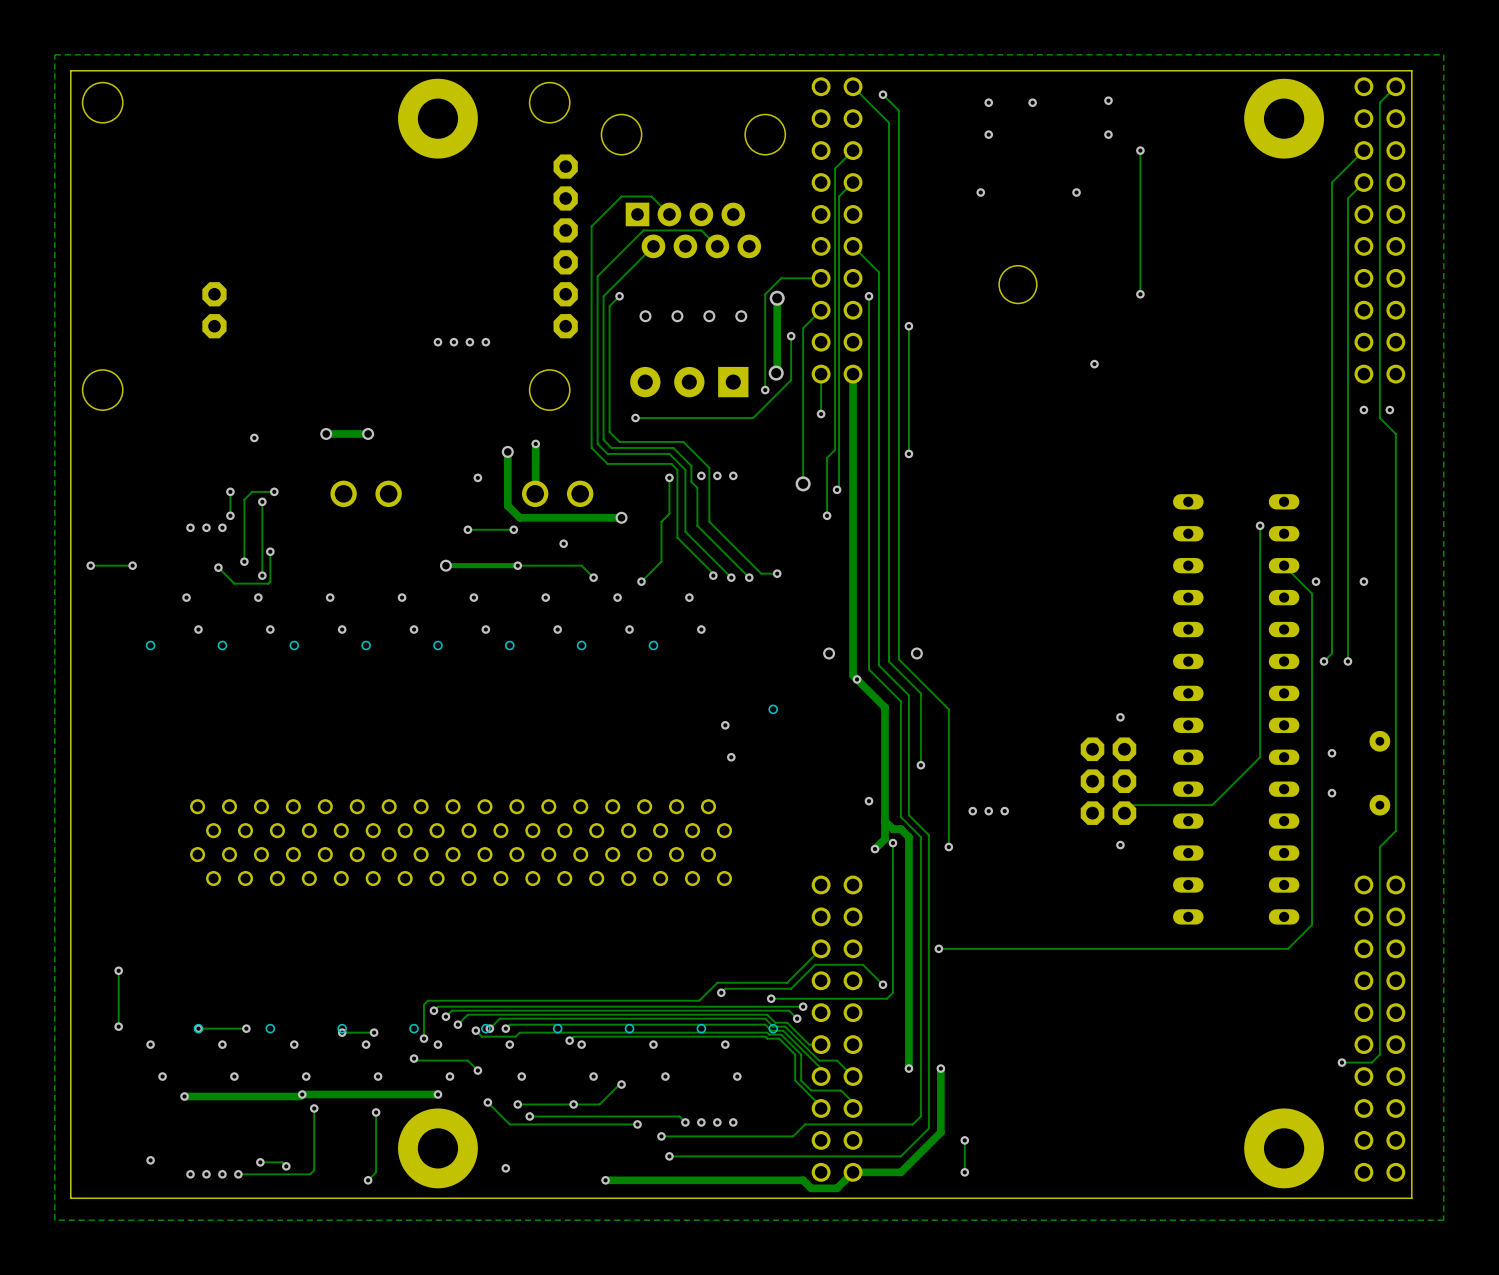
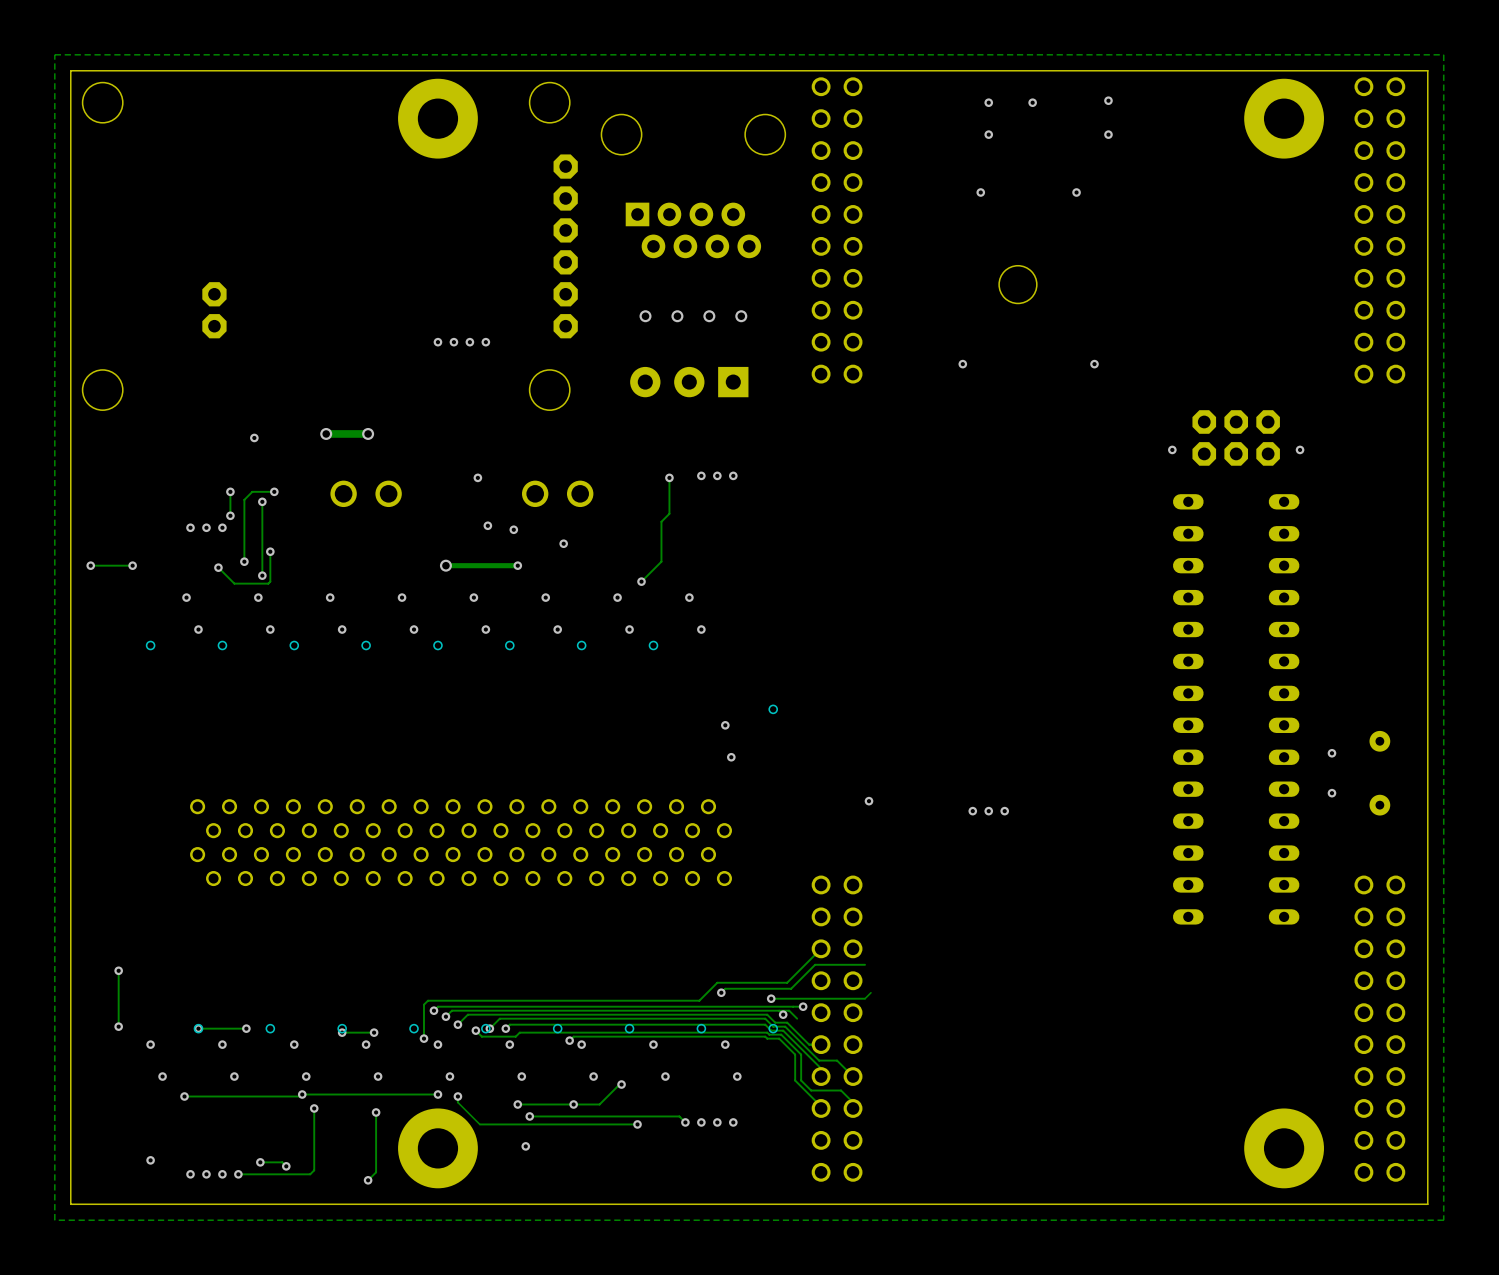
board edge: (1411, 70) (1411, 1198) (70, 1198) -> (1411, 70) (1427, 70) (1427, 1204) (70, 1204) (70, 1198)
track: (853, 86) (888, 122) (888, 661) (920, 693) (920, 765) -> none
track: (1395, 86) (1379, 102) (1379, 418) (1395, 433) (1395, 831) (1379, 847) (1379, 1054) (1371, 1062) (1341, 1062) -> none
track: (882, 94) (898, 110) (898, 659) (948, 709) (948, 847) -> none
via: (882, 94) -> none
track: (853, 150) (835, 168) (835, 449) (827, 457) (827, 515) -> none
track: (1140, 150) (1140, 294) -> none
via: (1140, 150) -> none
track: (1363, 150) (1331, 182) (1331, 653) (1324, 661) -> none
track: (853, 182) (839, 196) (839, 487) (837, 489) -> none
track: (1363, 182) (1347, 198) (1347, 661) -> none
track: (669, 214) (651, 196) (621, 196) (591, 226) (591, 447) (607, 463) (671, 463) (677, 469) (677, 537) (713, 575) -> none
track: (653, 246) (603, 296) (603, 439) (611, 447) (673, 447) (691, 465) (691, 481) (697, 487) (697, 525) (749, 577) -> none
track: (717, 246) (701, 230) (643, 230) (597, 276) (597, 443) (607, 453) (669, 453) (685, 469) (685, 531) (731, 577) -> none
track: (853, 246) (878, 272) (878, 665) (908, 695) (908, 815) (928, 835) (928, 1128) (900, 1156) (669, 1156) -> none
track: (821, 278) (781, 278) (765, 294) (765, 390) -> none
via: (1140, 294) -> none
track: (619, 296) (609, 306) (609, 431) (619, 441) (683, 441) (709, 467) (709, 521) (761, 573) (777, 573) -> none
via: (619, 296) -> none
track: (869, 296) (869, 669) (900, 701) (900, 817) (920, 837) (920, 1116) (912, 1124) (805, 1124) (793, 1136) (661, 1136) -> none
via: (869, 296) -> none
track: (777, 298) (776, 373) -> none
via: (777, 298) -> none
track: (821, 310) (803, 328) (803, 483) -> none
track: (908, 326) (908, 453) -> none
via: (908, 326) -> none
track: (791, 336) (791, 380) (753, 418) (635, 418) -> none
via: (791, 336) -> none
via: none -> (962, 364)
via: (776, 373) -> none
track: (821, 374) (821, 414) -> none
track: (853, 374) (853, 675) (884, 707) (884, 839) (874, 849) -> none
via: (765, 390) -> none
via: (1363, 410) -> none
via: (1389, 410) -> none
via: (821, 414) -> none
via: (635, 418) -> none
part: none -> (1236, 437)
track: (535, 443) (535, 493) -> none
via: (535, 443) -> none
via: none -> (1172, 449)
via: none -> (1300, 449)
track: (507, 451) (507, 505) (519, 517) (621, 517) -> none
via: (507, 451) -> none
via: (908, 453) -> none
via: (803, 483) -> none
via: (837, 489) -> none
via: (827, 515) -> none
via: (621, 517) -> none
track: (1260, 525) (1260, 757) (1212, 805) (1132, 805) (1124, 813) -> none
via: (1260, 525) -> none
via position: (467, 529) -> (487, 525)
track: (513, 529) (467, 529) -> none
track: (517, 565) (581, 565) (593, 577) -> none
track: (1284, 565) (1312, 593) (1312, 924) (1288, 948) (938, 948) -> none
via: (777, 573) -> none
via: (713, 575) -> none
via: (593, 577) -> none
via: (731, 577) -> none
via: (749, 577) -> none
via: (1316, 581) -> none
via: (1363, 581) -> none
via: (829, 653) -> none
via: (916, 653) -> none
via: (1324, 661) -> none
via: (1347, 661) -> none
via: (857, 679) -> none
via: (1120, 717) -> none
via: (920, 765) -> none
part: (1108, 781) -> none
track: (884, 821) (892, 829) (900, 829) (908, 837) (908, 1068) -> none
track: (892, 843) (892, 992) (886, 998) (865, 998) -> (871, 992) (865, 998)
via: (892, 843) -> none
via: (1120, 845) -> none
via: (948, 847) -> none
via: (874, 849) -> none
via: (938, 948) -> none
track: (863, 964) (882, 984) -> (863, 964) (865, 964)
via: (882, 984) -> none
via position: (797, 1018) -> (783, 1014)
track: (414, 1058) (416, 1060) (467, 1060) (477, 1070) -> none
via: (414, 1058) -> none
via: (1341, 1062) -> none
via: (908, 1068) -> none
track: (940, 1068) (940, 1132) (900, 1172) (853, 1172) (837, 1188) (811, 1188) (803, 1180) (605, 1180) -> none
via: (940, 1068) -> none
via: (477, 1070) -> none
track width: thick (437, 1094) (302, 1094) -> thin (437, 1094) (302, 1094)
track width: thick (300, 1096) (184, 1096) -> thin (300, 1096) (184, 1096)
via: none -> (457, 1096)
track: (487, 1102) (509, 1124) -> (457, 1096) (457, 1102) (479, 1124) (509, 1124)
via: (487, 1102) -> none
via: (661, 1136) -> none
track: (964, 1140) (964, 1172) -> none
via: (964, 1140) -> none
via: none -> (525, 1146)
via: (669, 1156) -> none
via: (505, 1168) -> none
via: (964, 1172) -> none
via: (605, 1180) -> none

